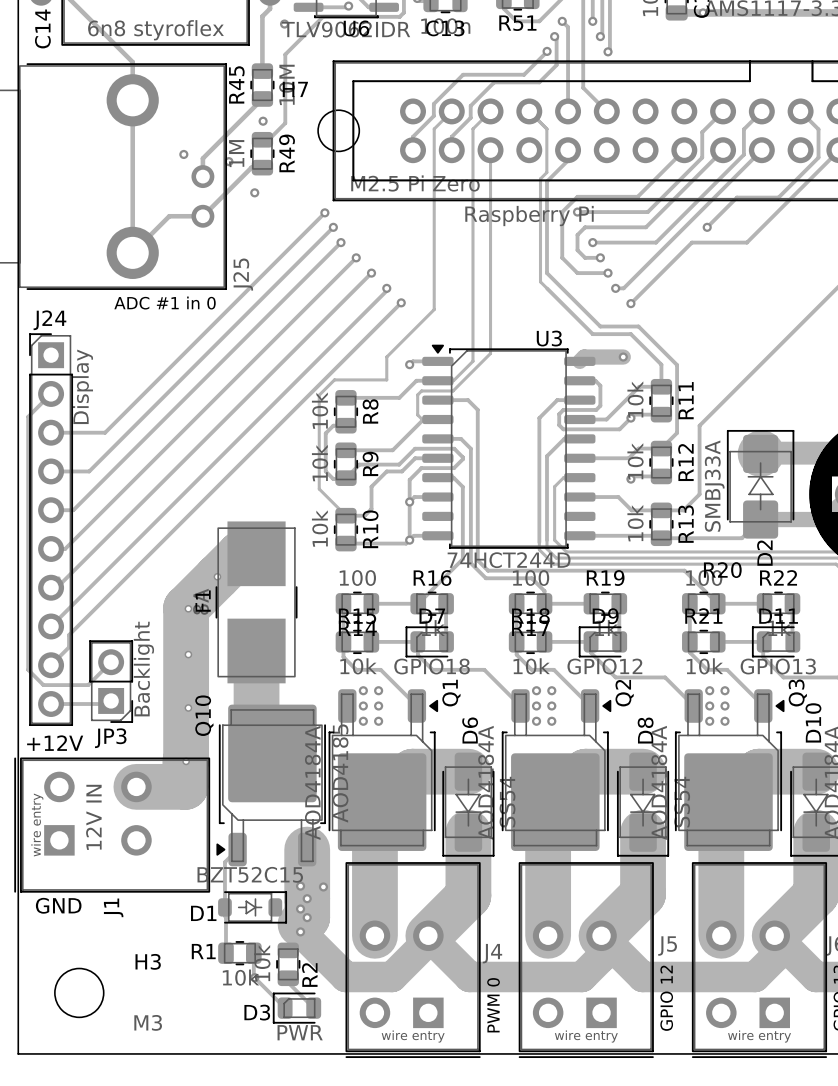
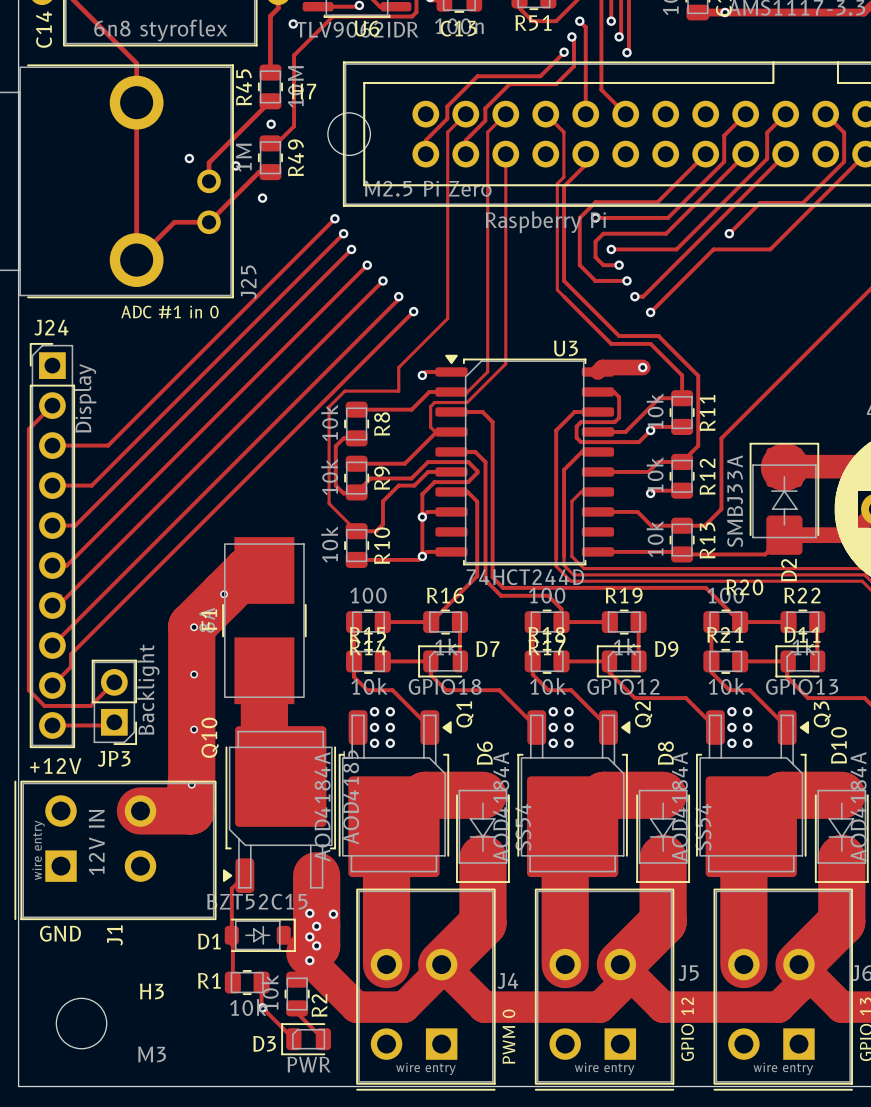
D7 name position: D7 (432, 616) -> D7 (487, 649)
D9 name position: D9 (605, 616) -> D9 (666, 649)

